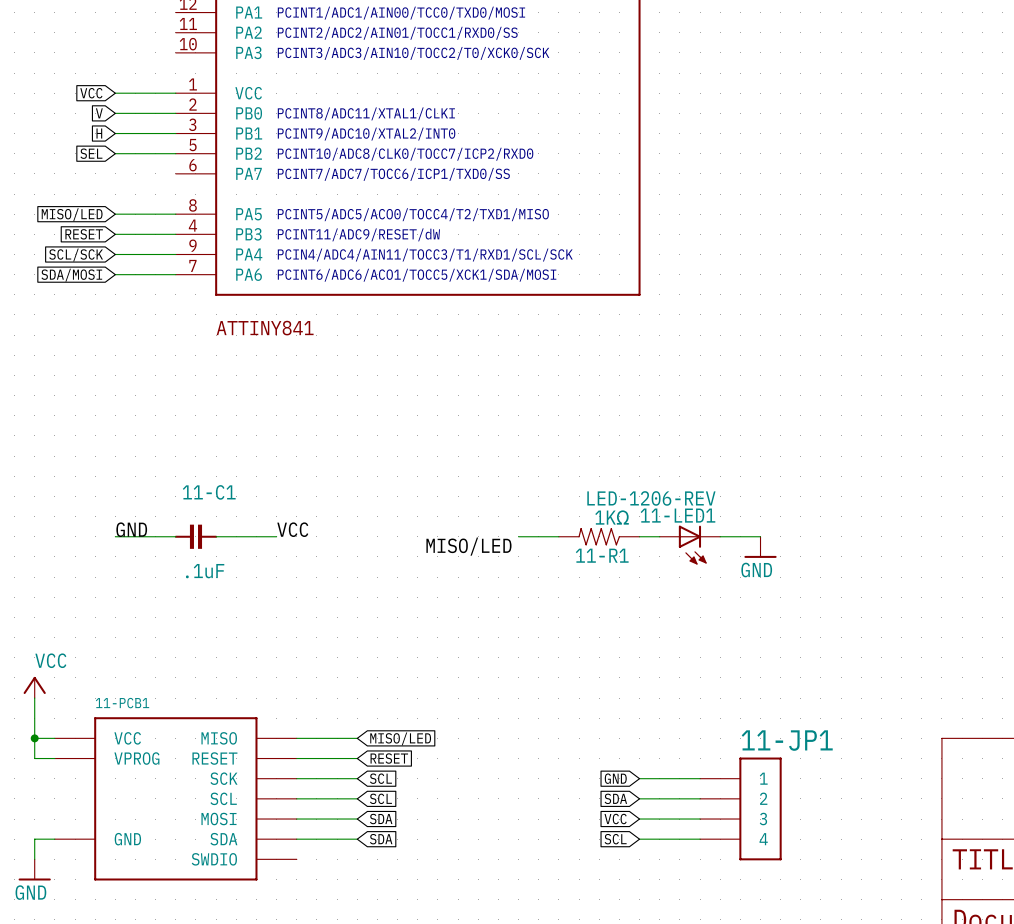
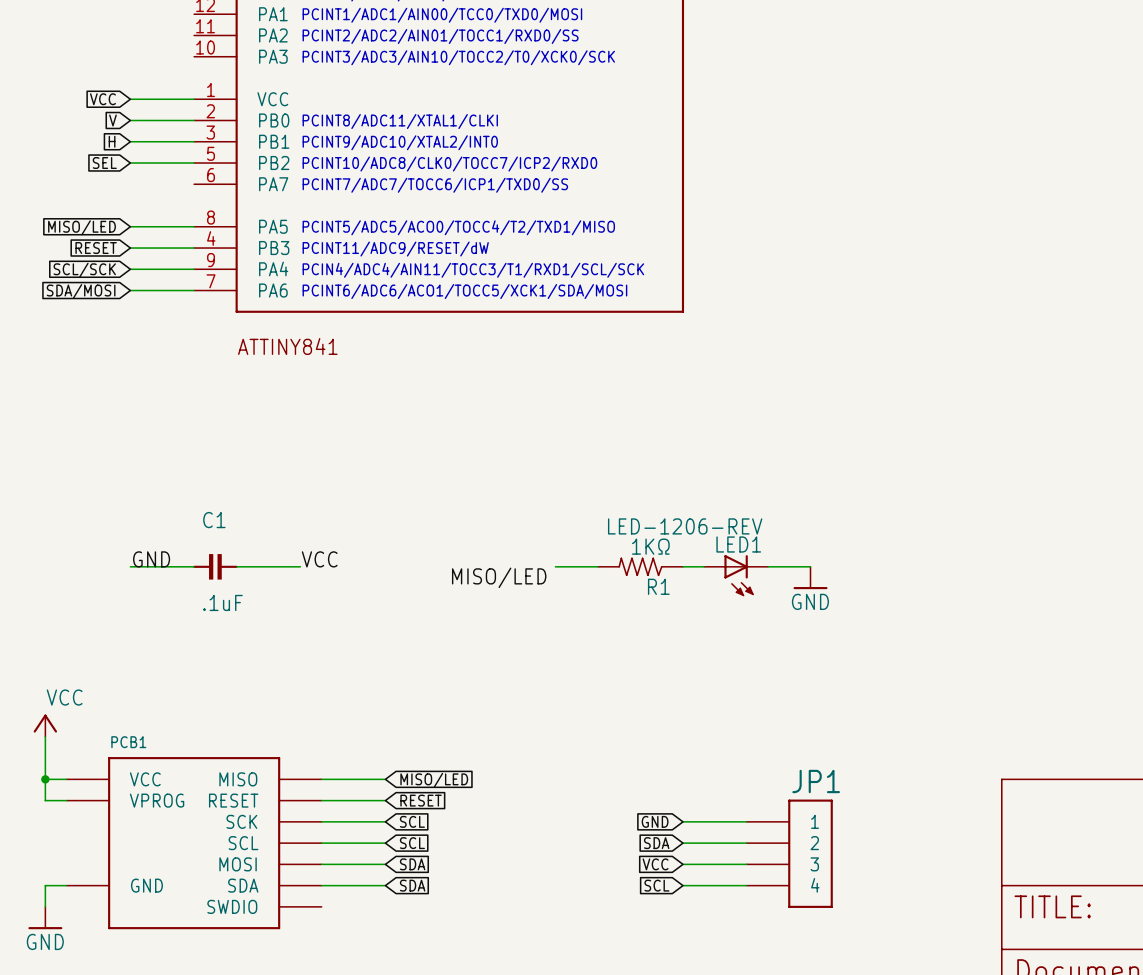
11-C1 name: 11-C1 (209, 492) -> C1 (214, 520)
11-LED1 name: 11-LED1 (677, 515) -> LED1 (738, 544)
11-R1 name: 11-R1 (602, 555) -> R1 (658, 586)
11-PCB1 name: 11-PCB1 (122, 703) -> PCB1 (128, 742)
11-JP1 name: 11-JP1 (787, 740) -> JP1 (816, 781)

